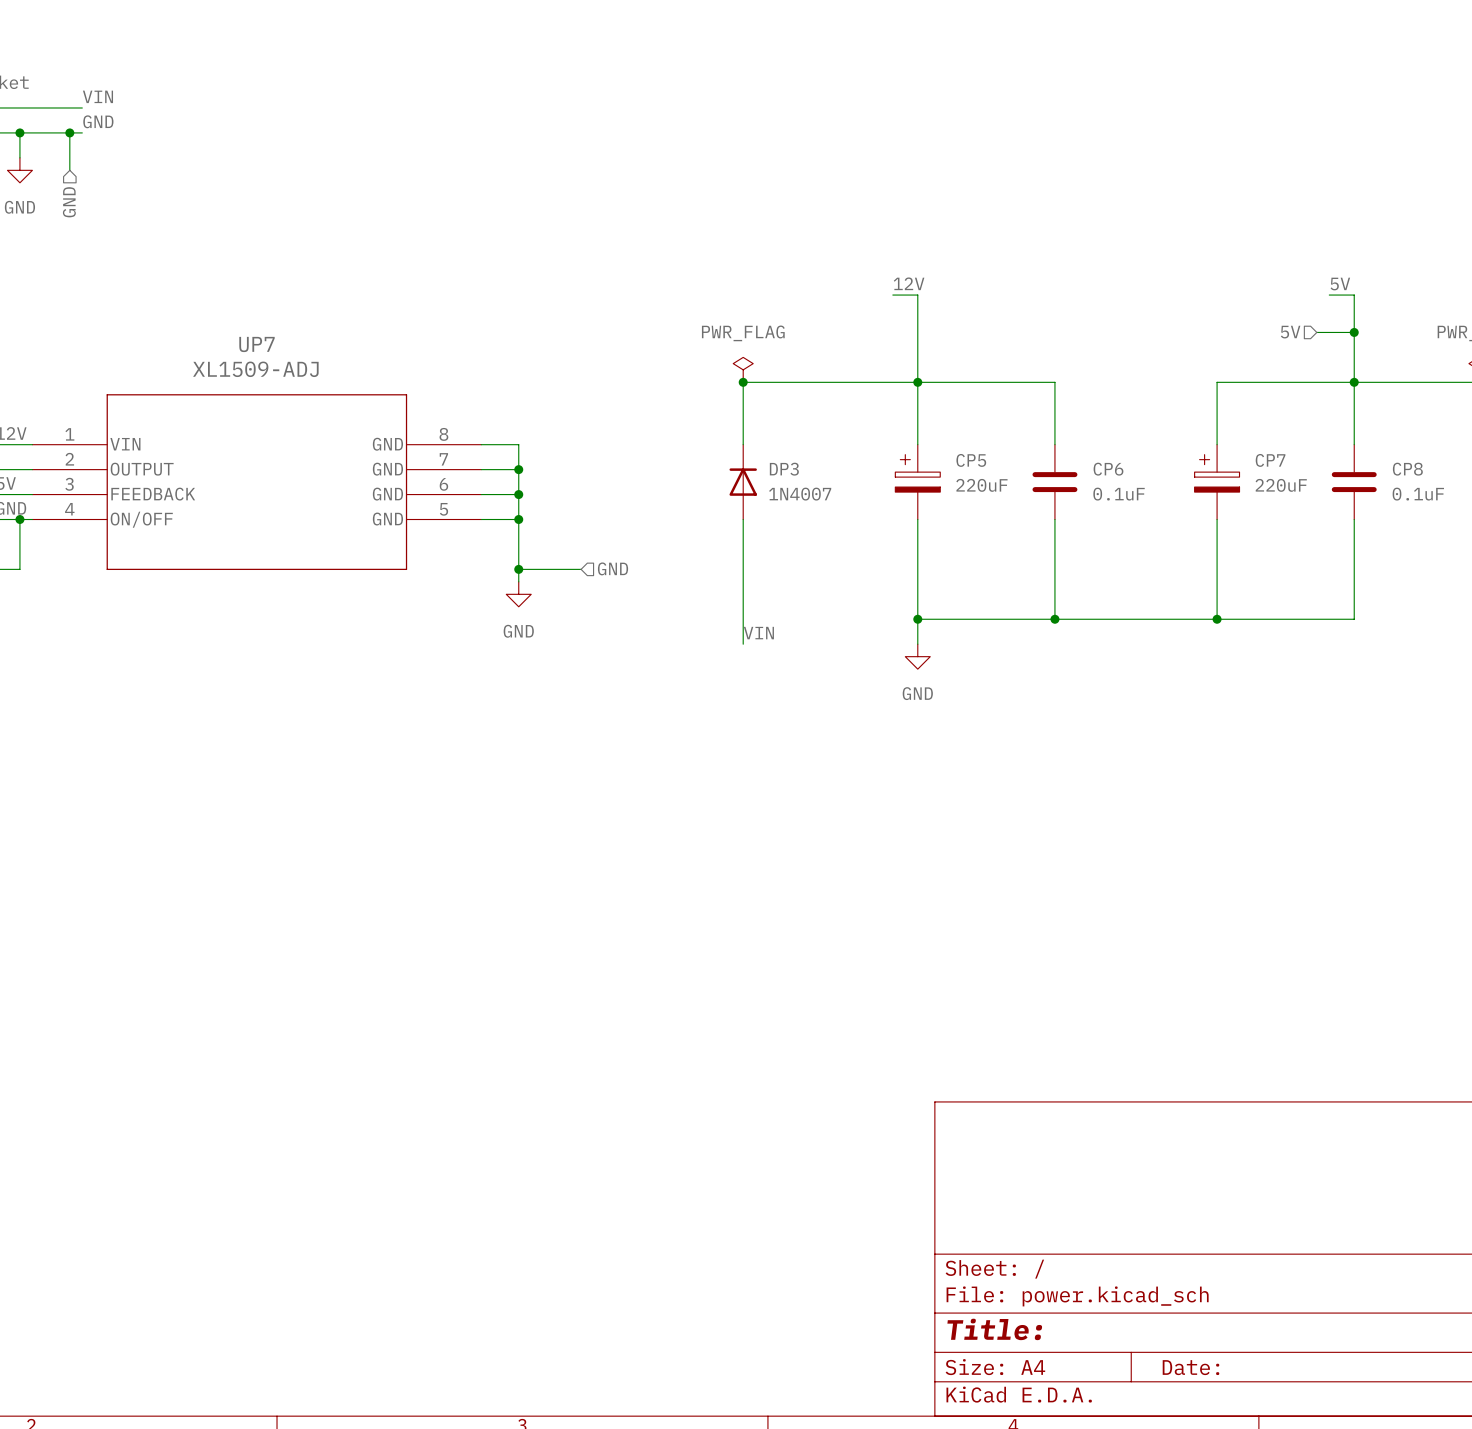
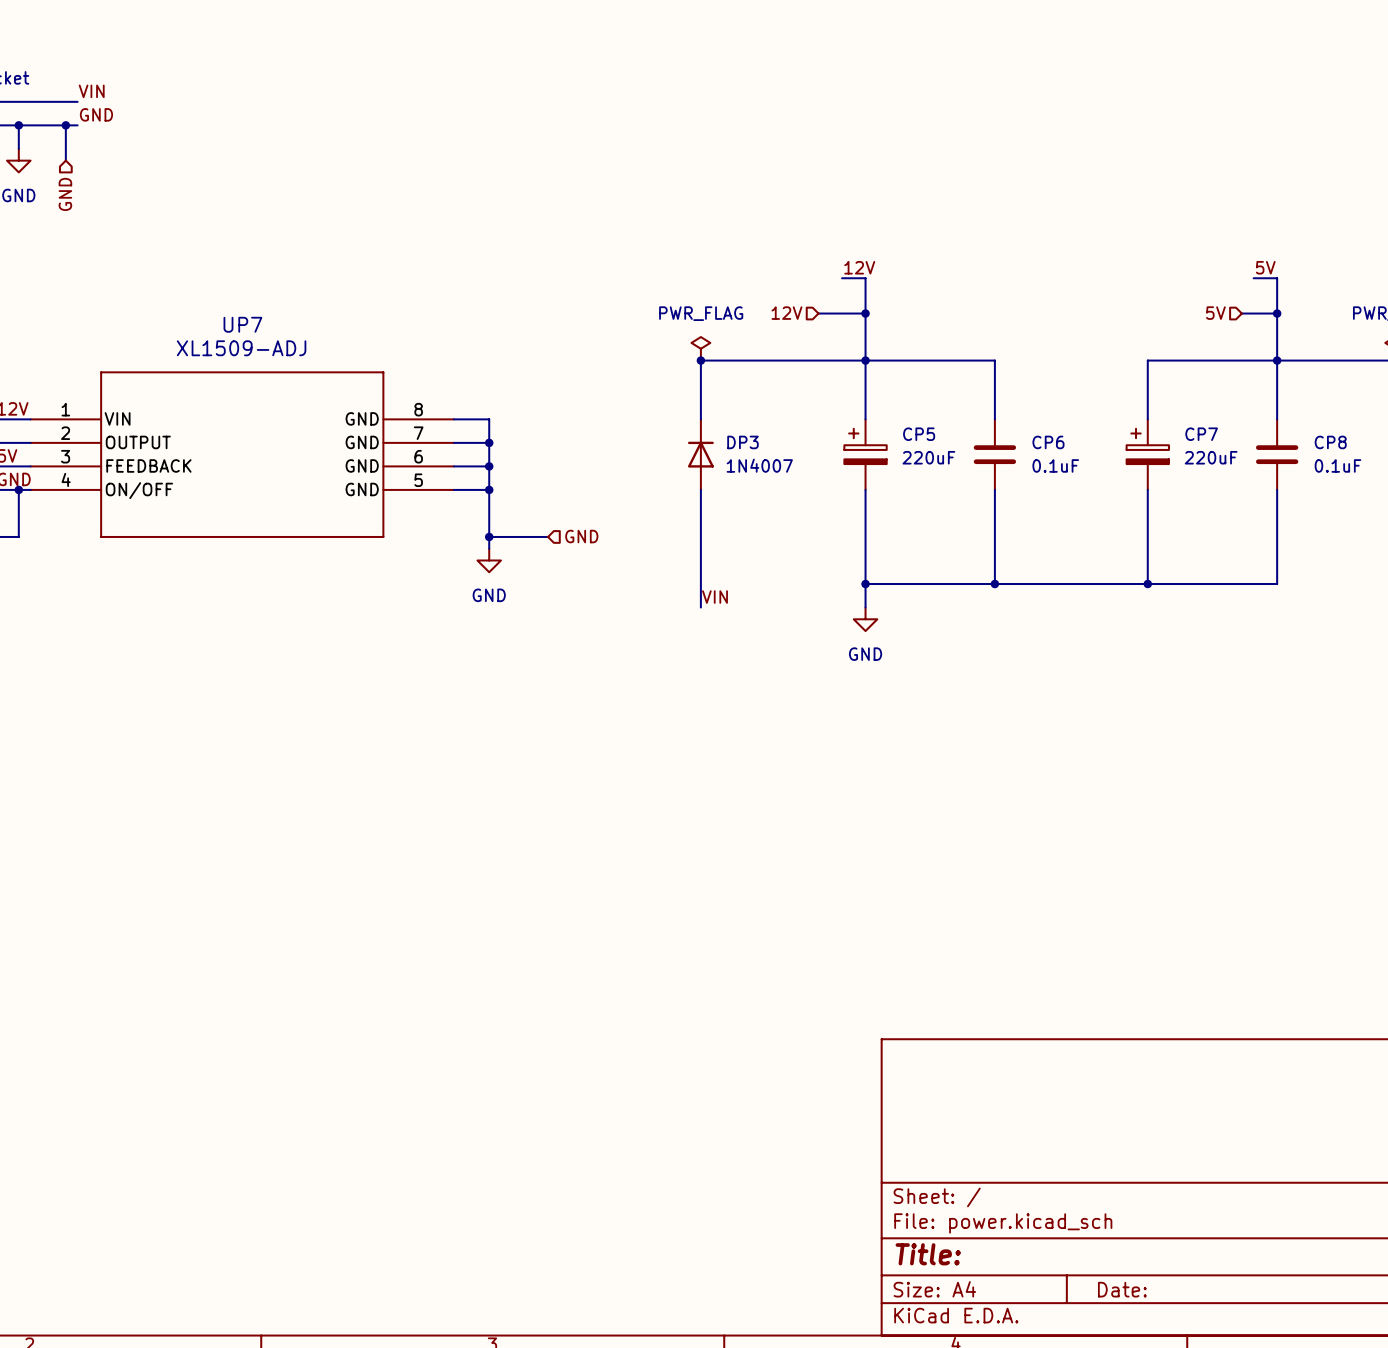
hierarchical label: none -> 12V (786, 313)
wire: none -> (818, 313) (865, 313)
junction: none -> (865, 313)

